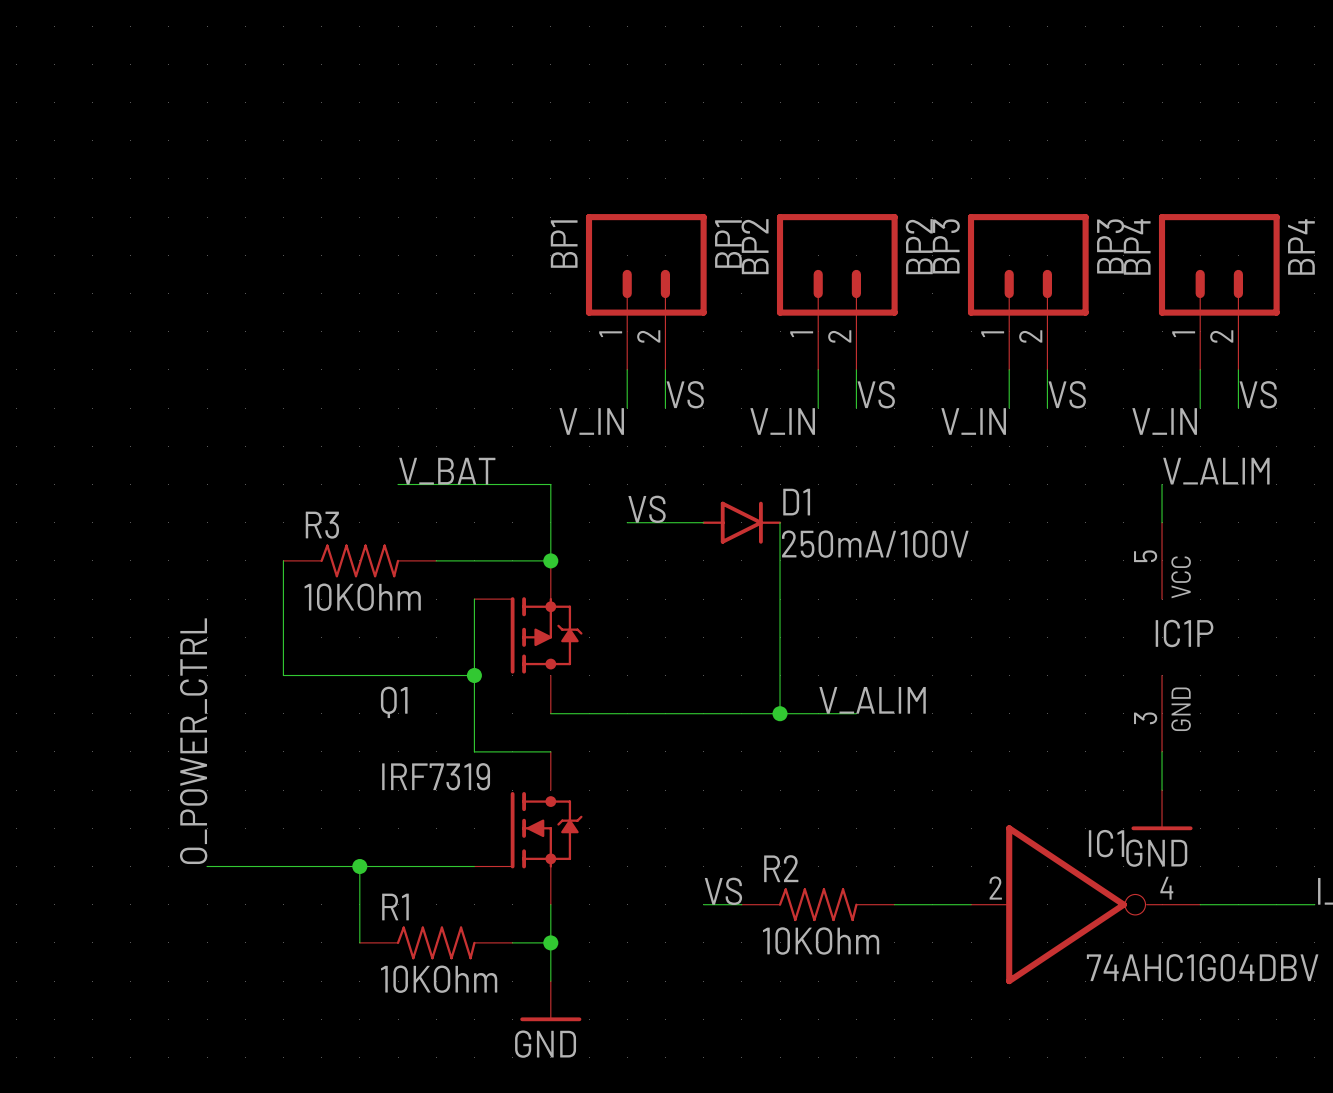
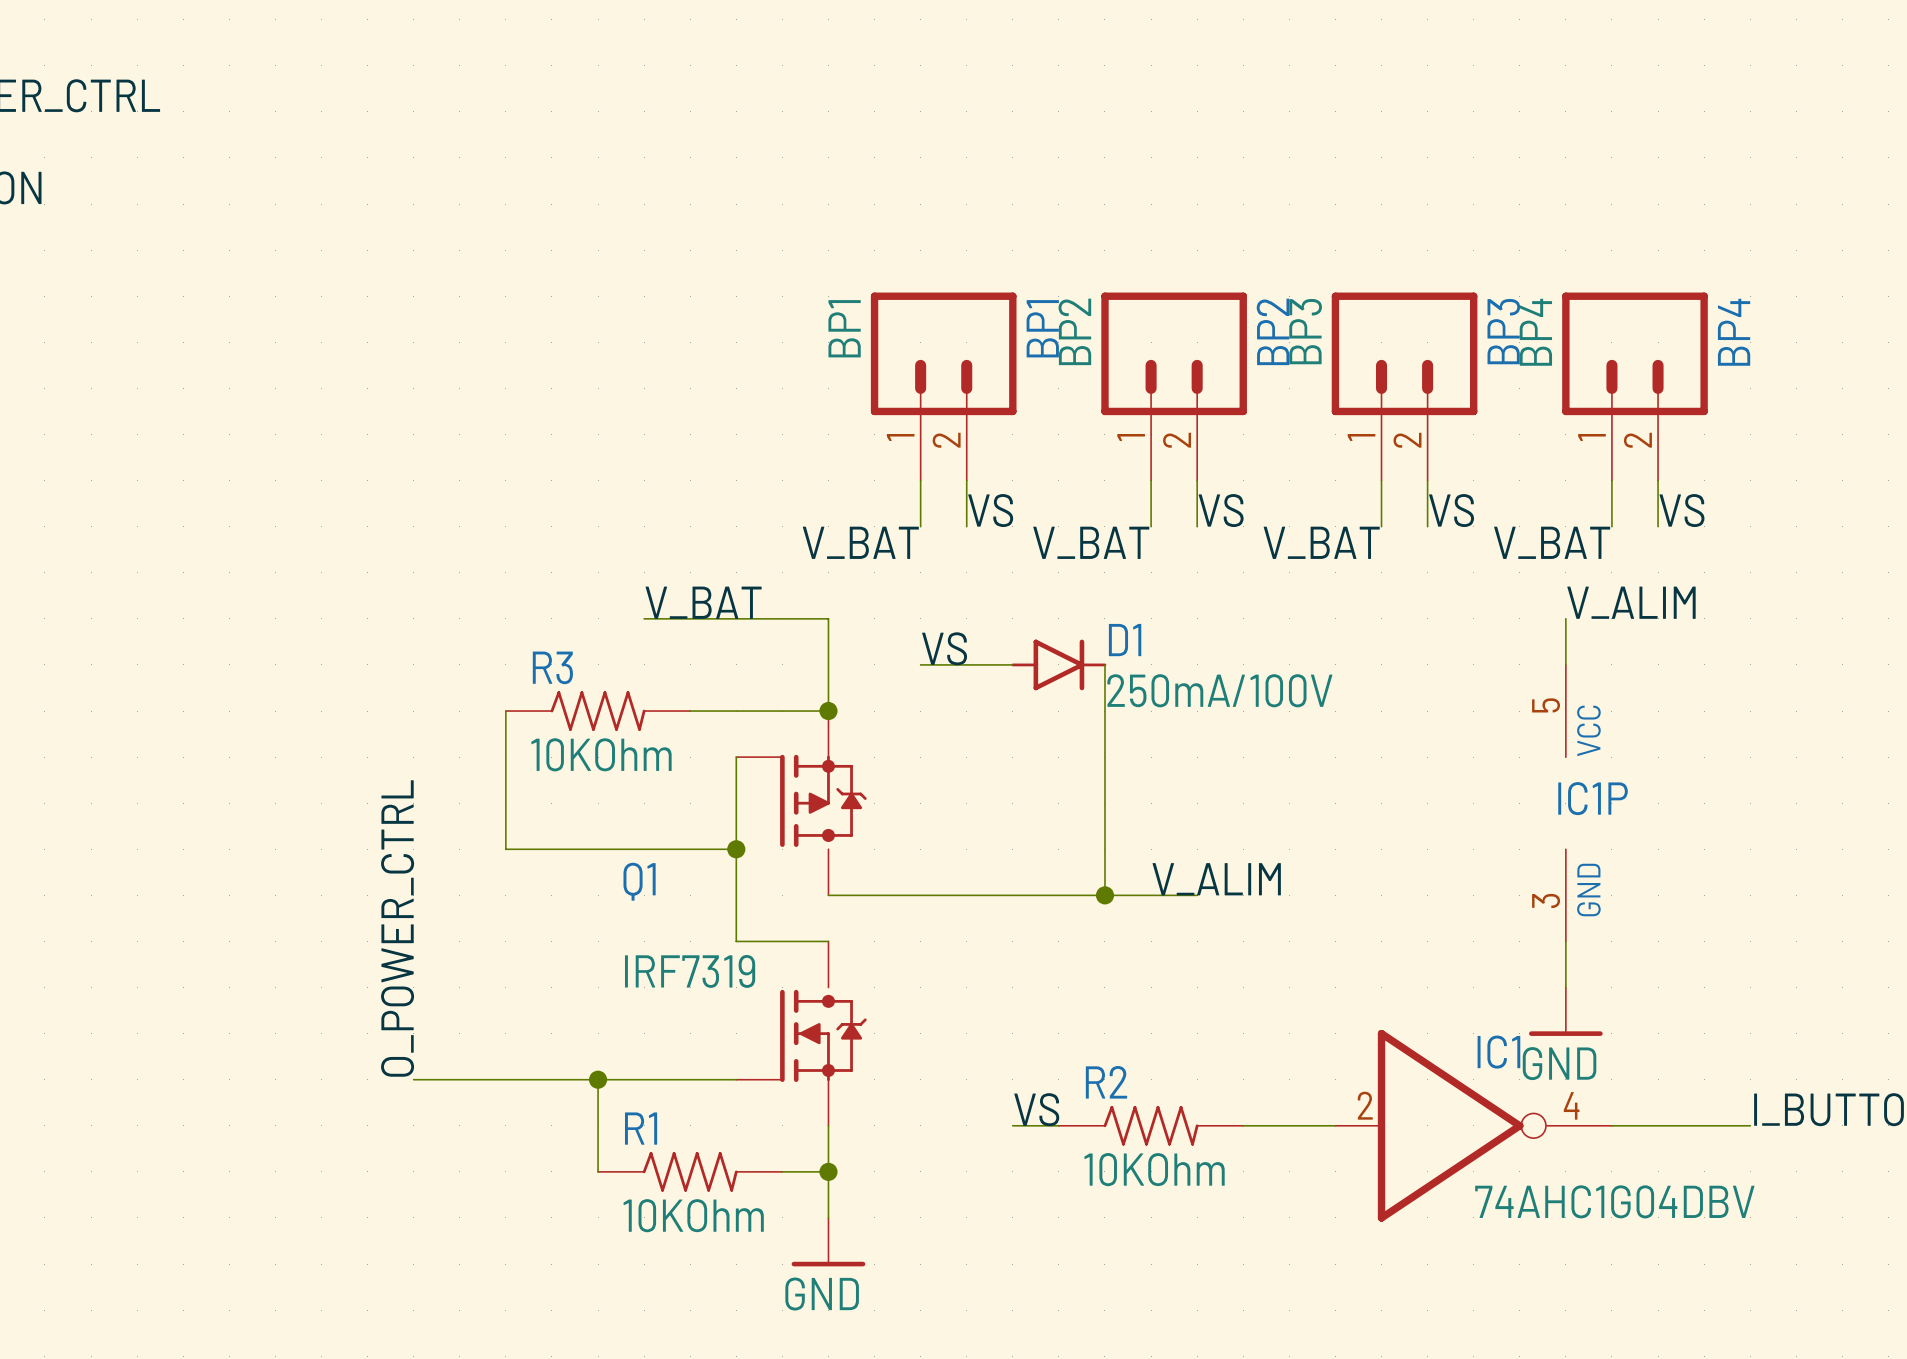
label: V_IN (591, 421) -> V_BAT (860, 542)
label: V_IN (782, 421) -> V_BAT (1091, 542)
label: V_IN (973, 421) -> V_BAT (1321, 542)
label: V_IN (1164, 421) -> V_BAT (1552, 542)

